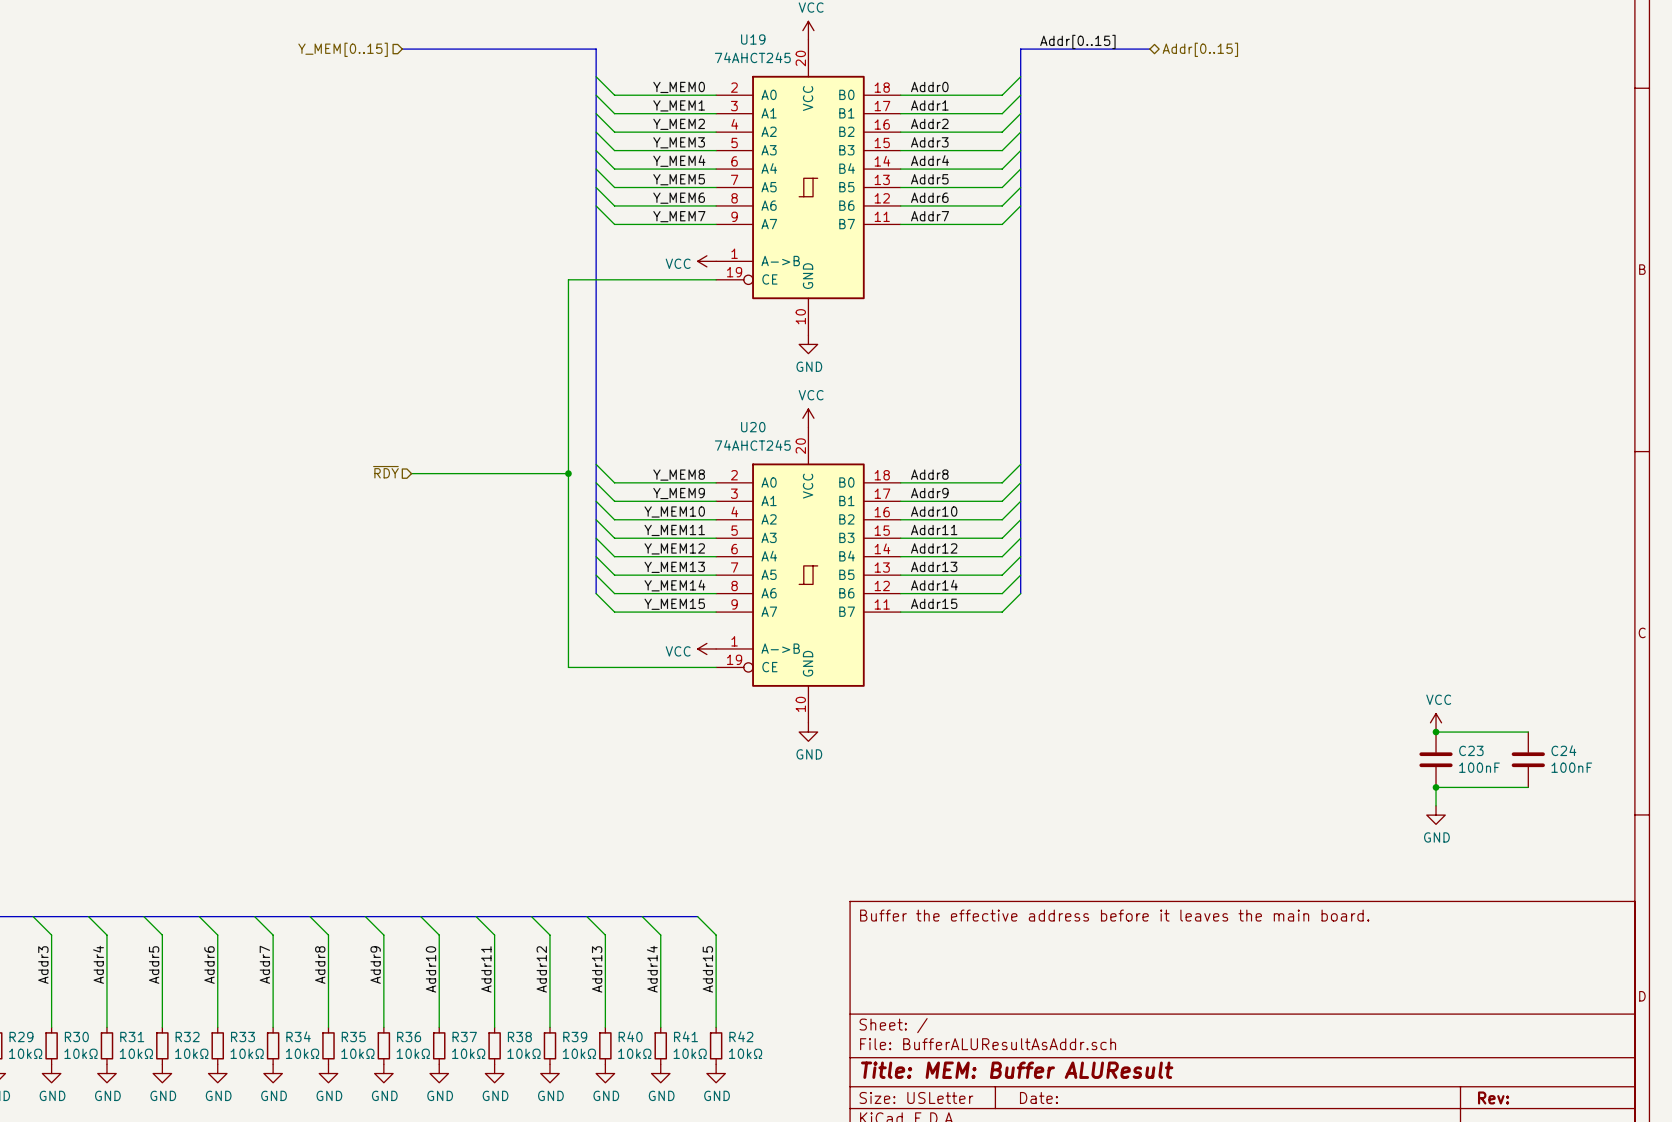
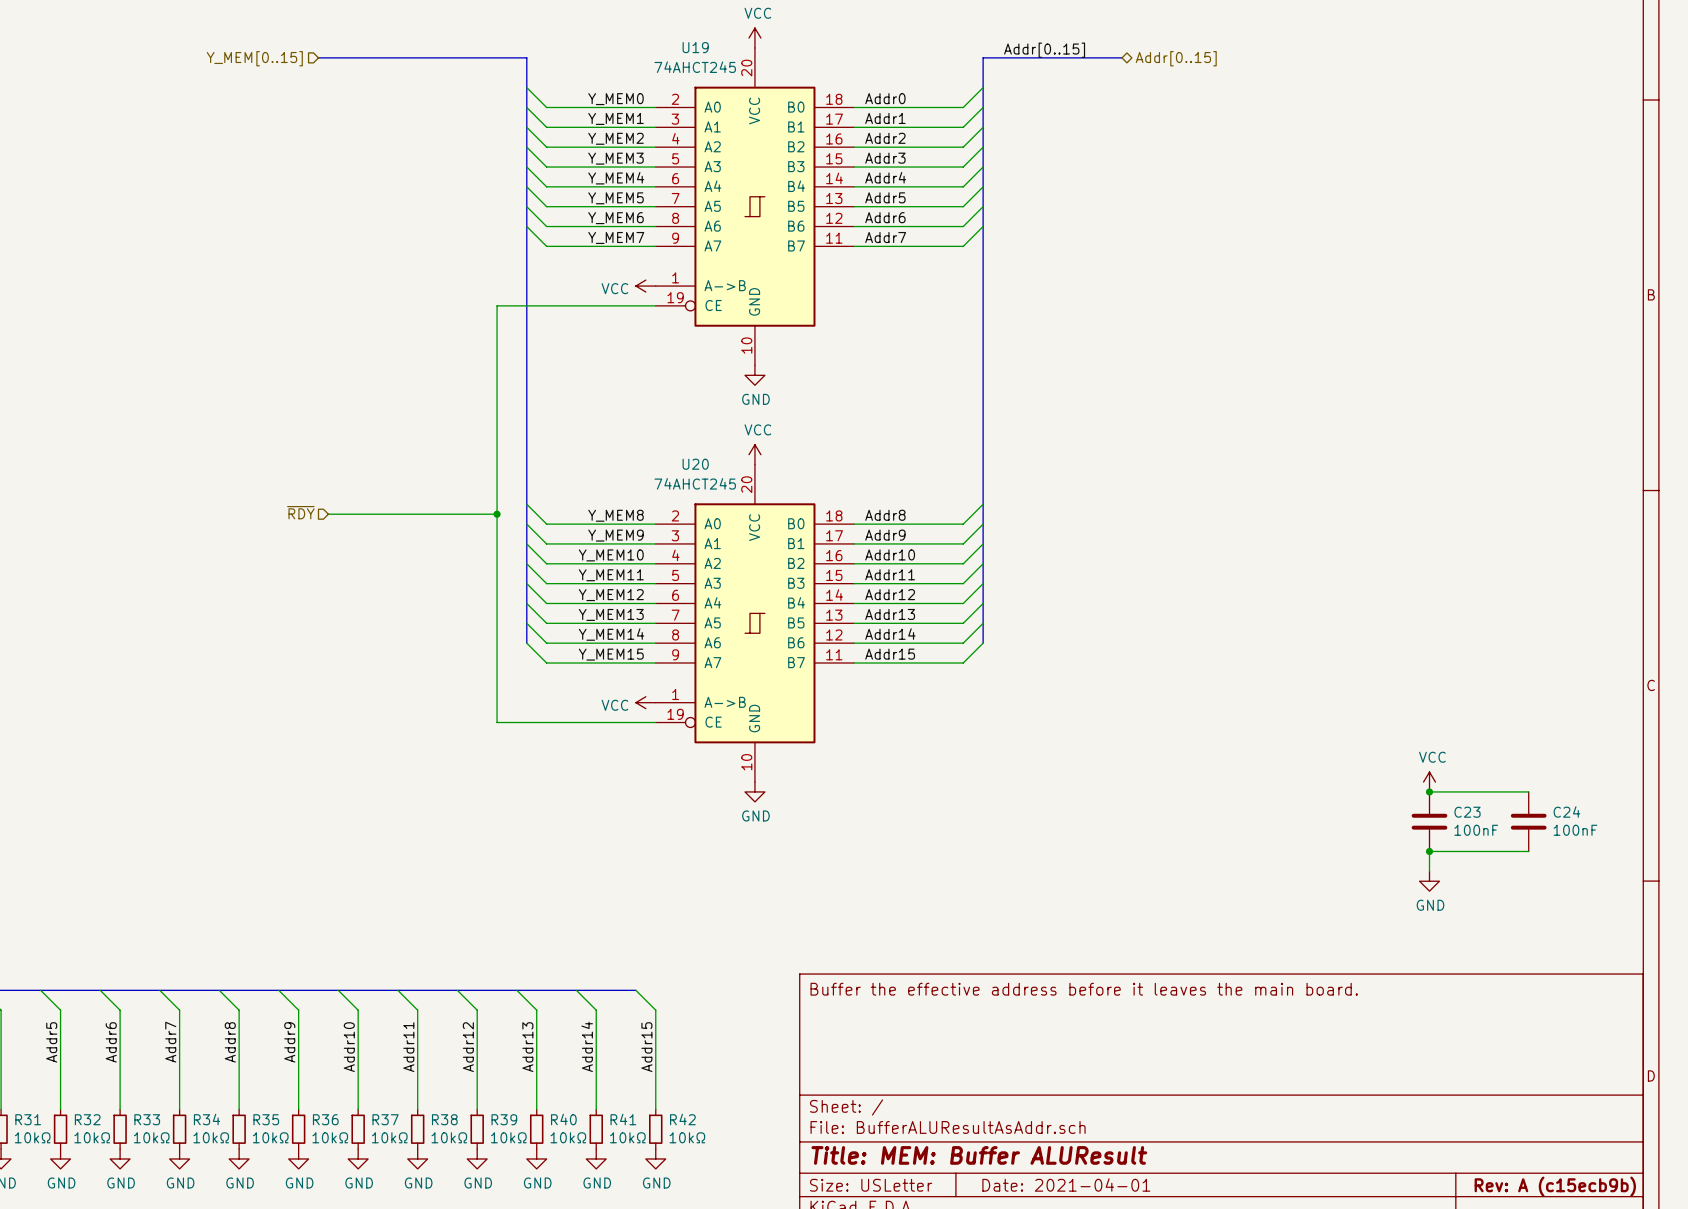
title block: Date: (1038, 1097) -> Date: 2021-04-01 (1066, 1184)
title block: Rev: (1493, 1097) -> Rev: A (c15ecb9b) (1555, 1186)

